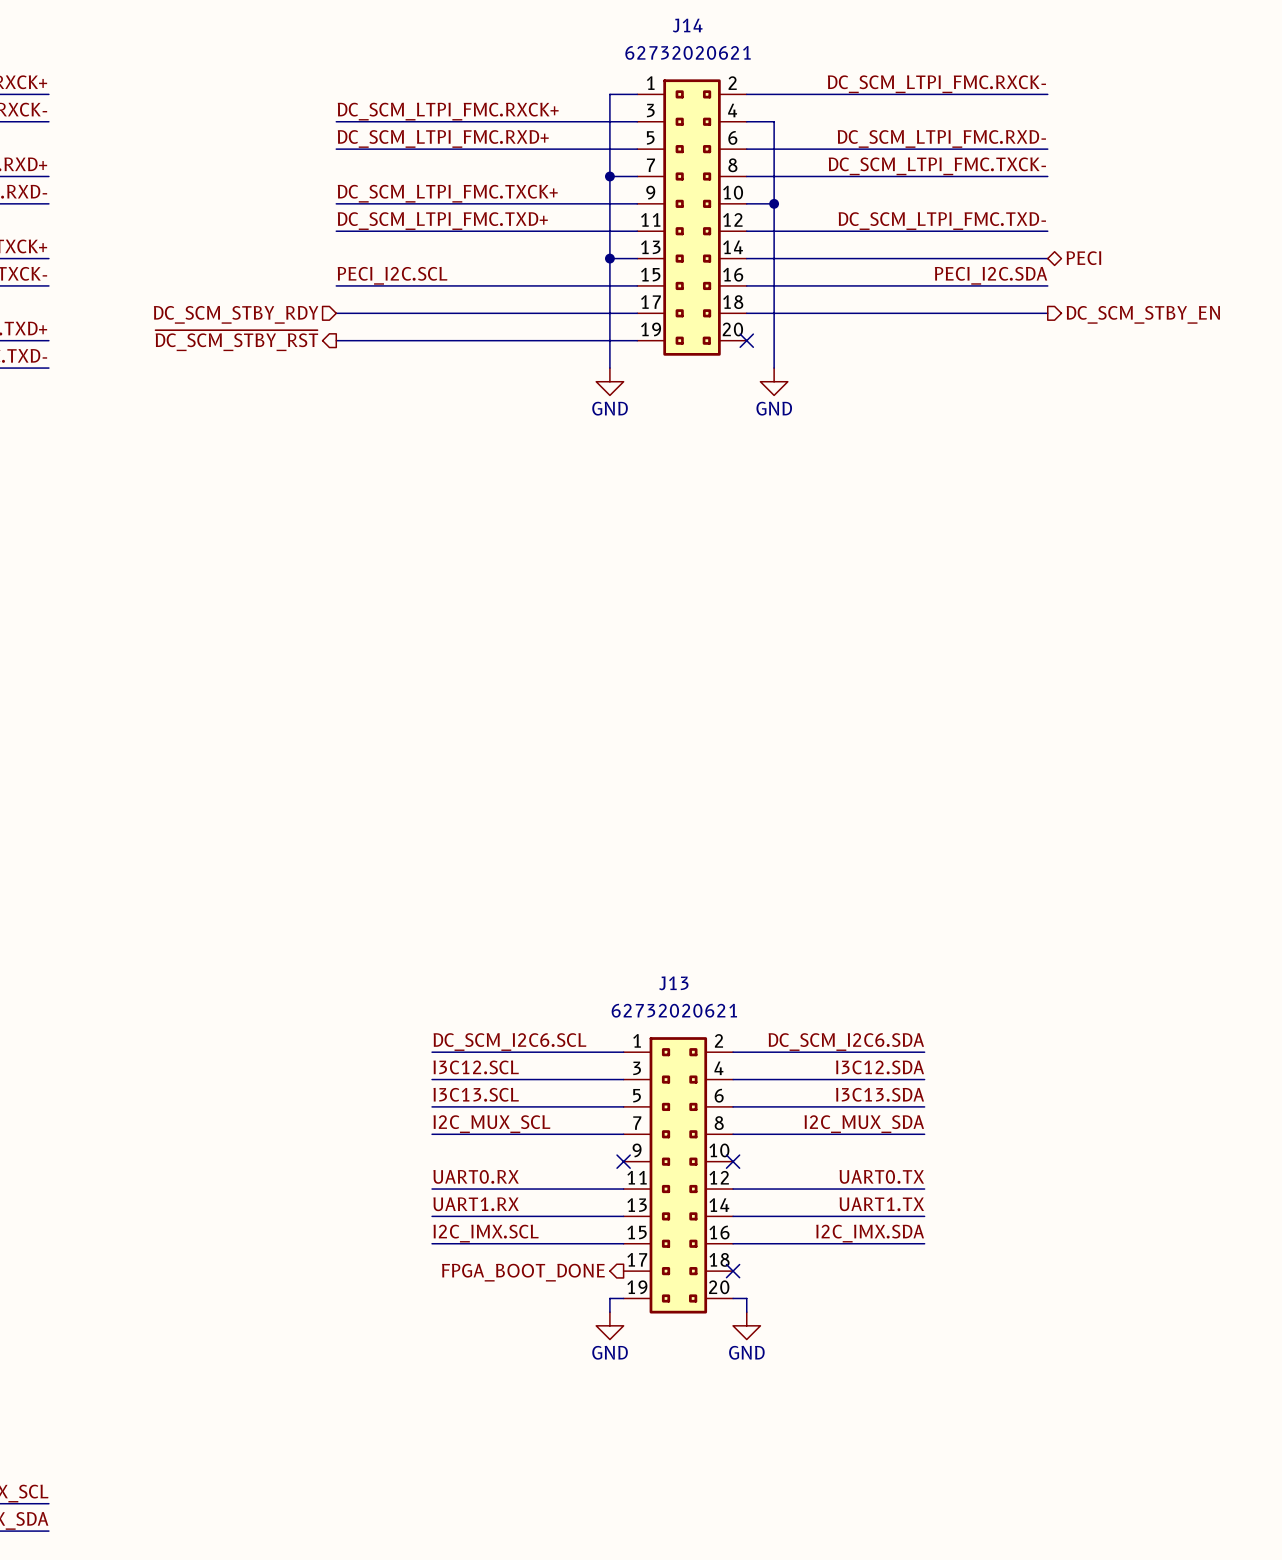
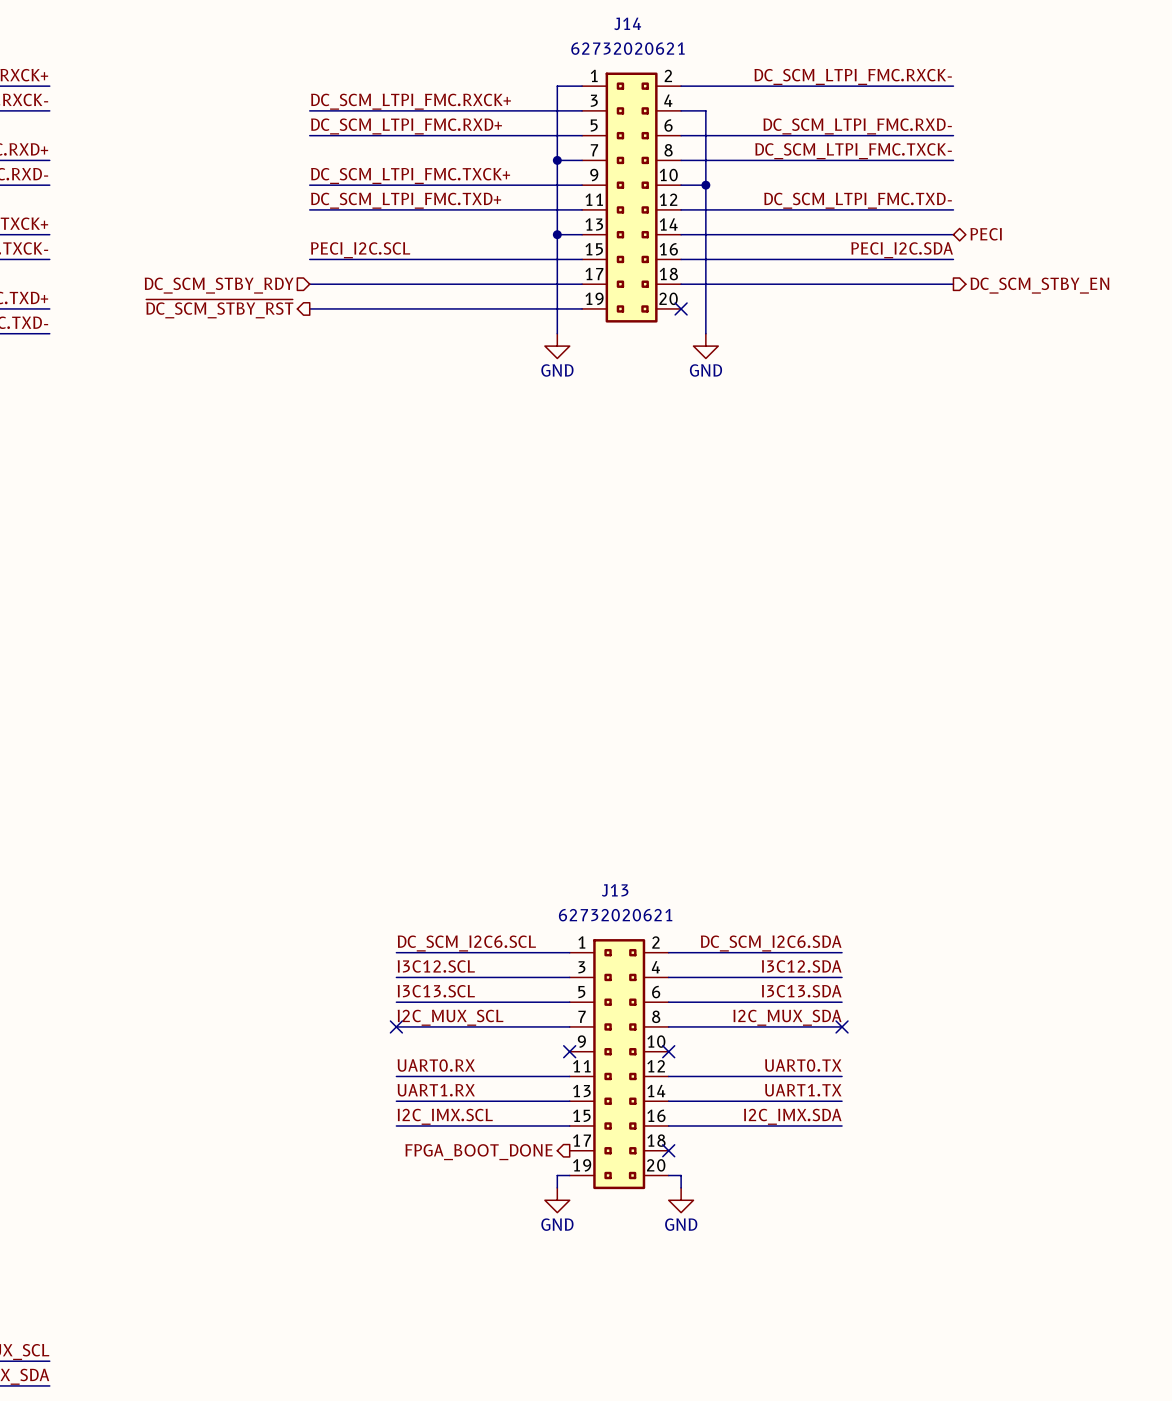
no-connect mark: none -> (396, 1026)
no-connect mark: none -> (842, 1026)

